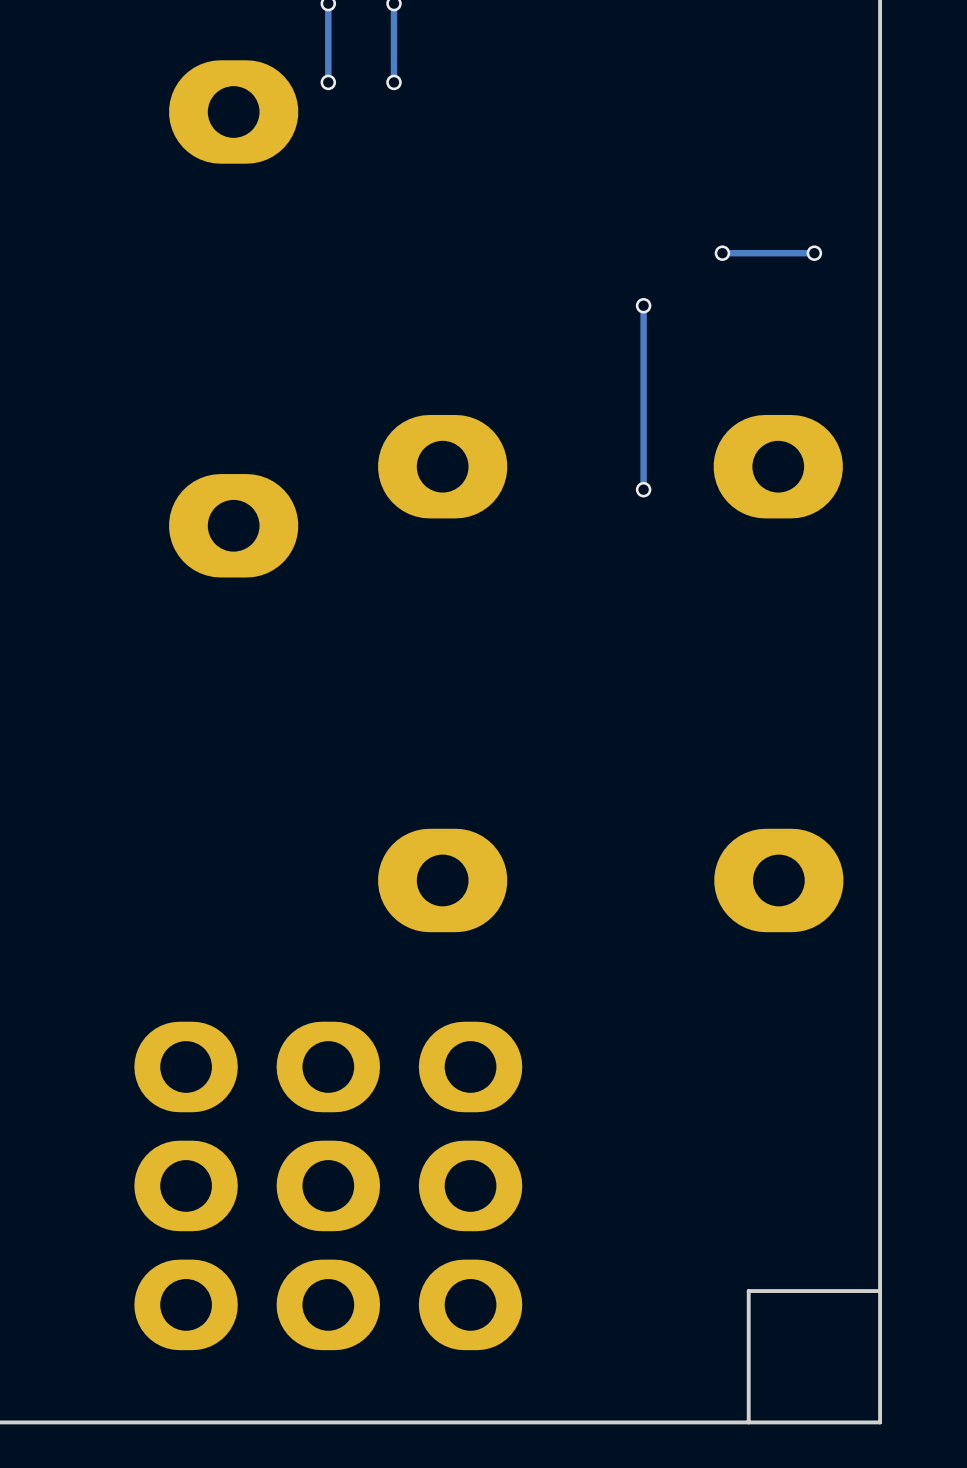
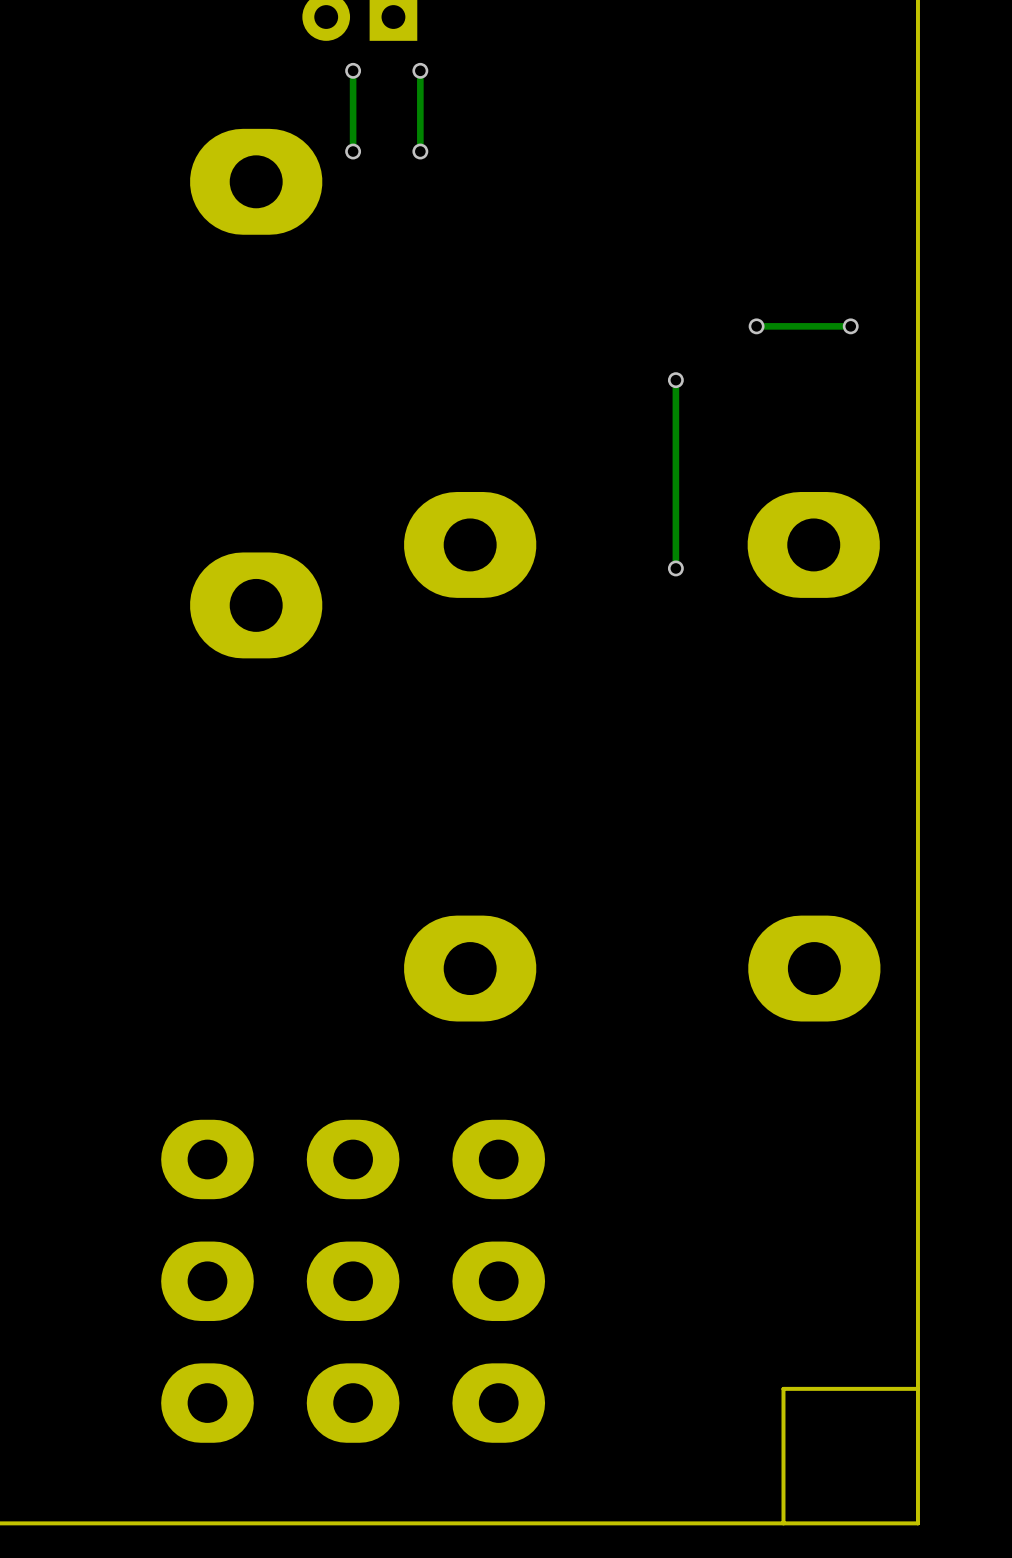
part footprint: [134, 1021, 523, 1351] -> [161, 1119, 546, 1443]

